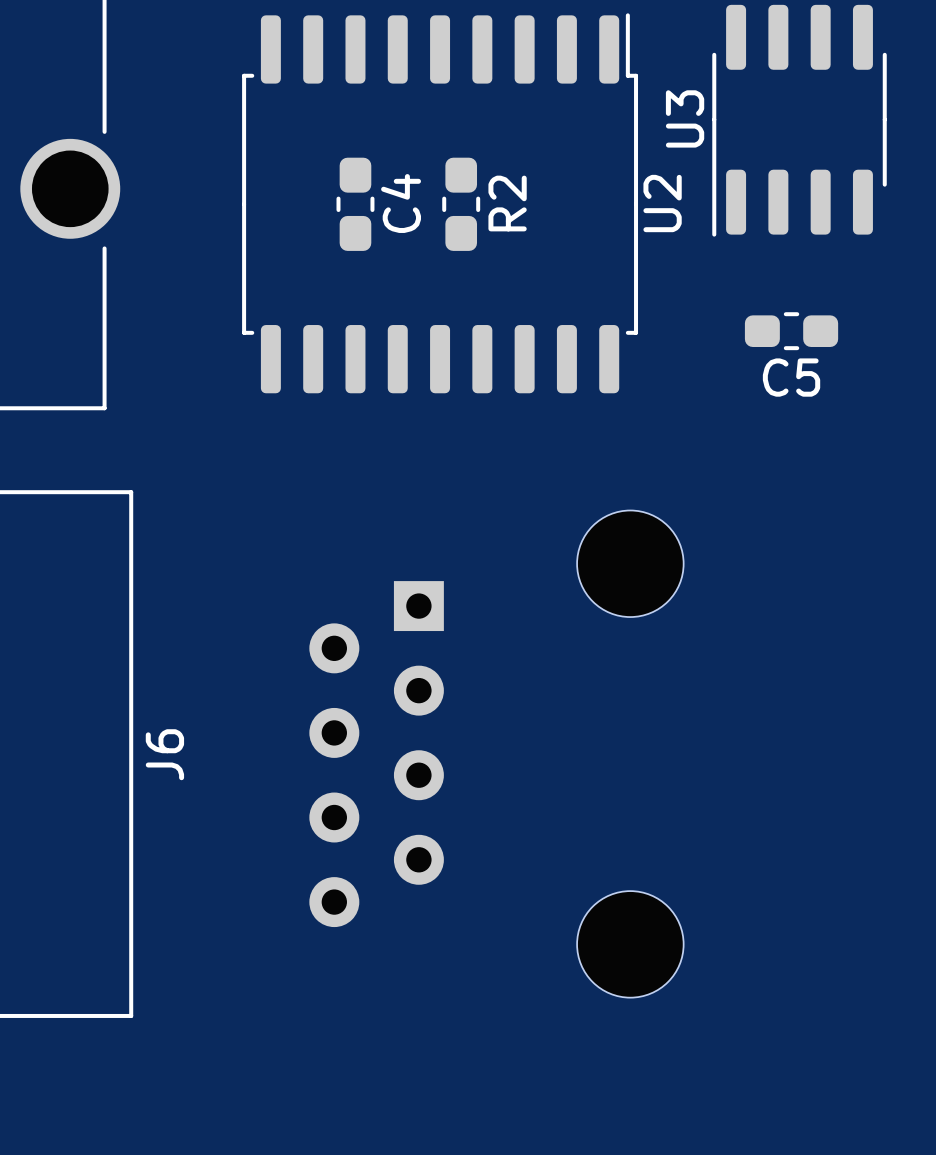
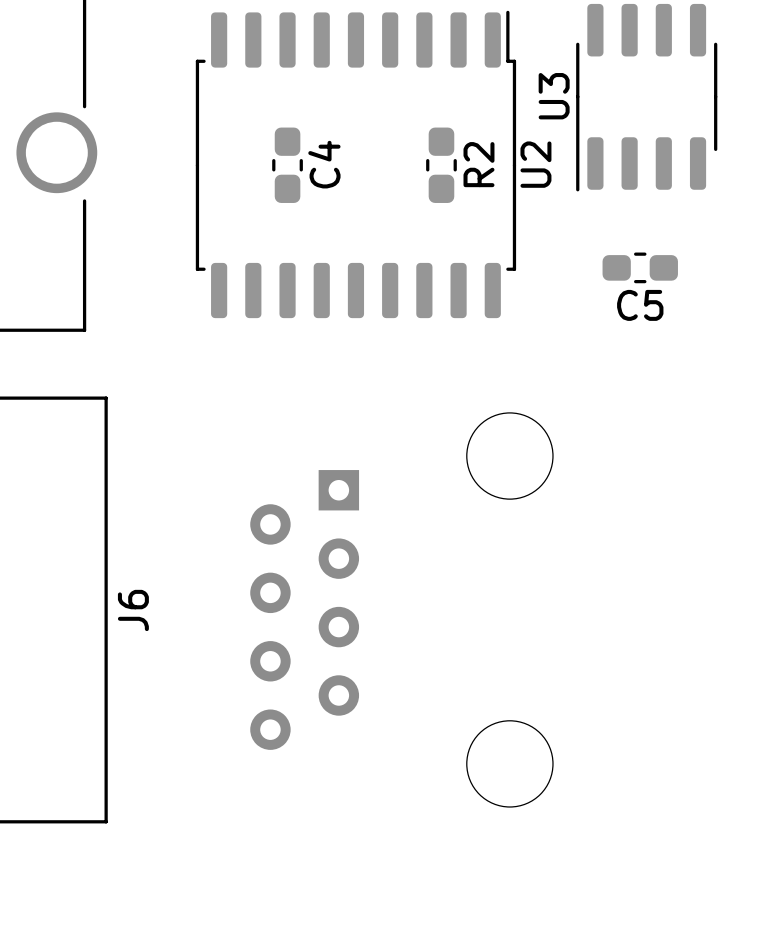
R2 position: (461, 204) -> (441, 165)

